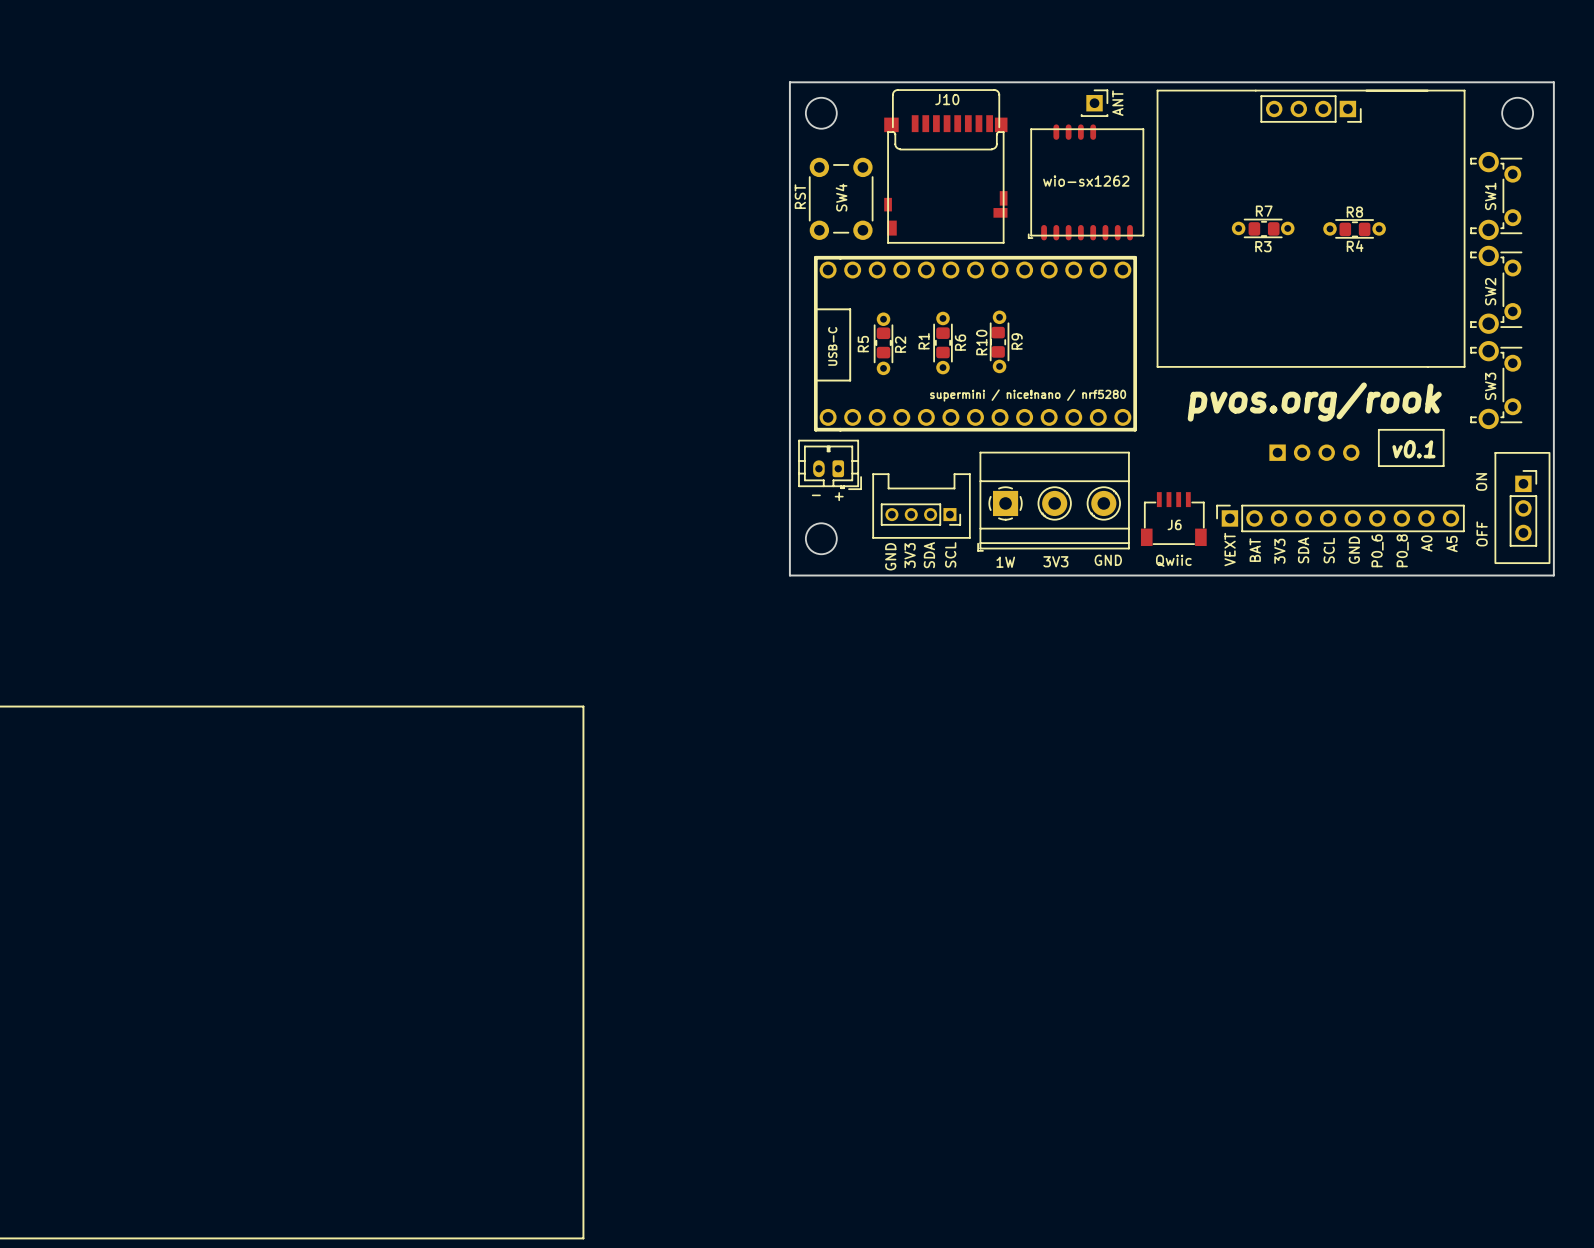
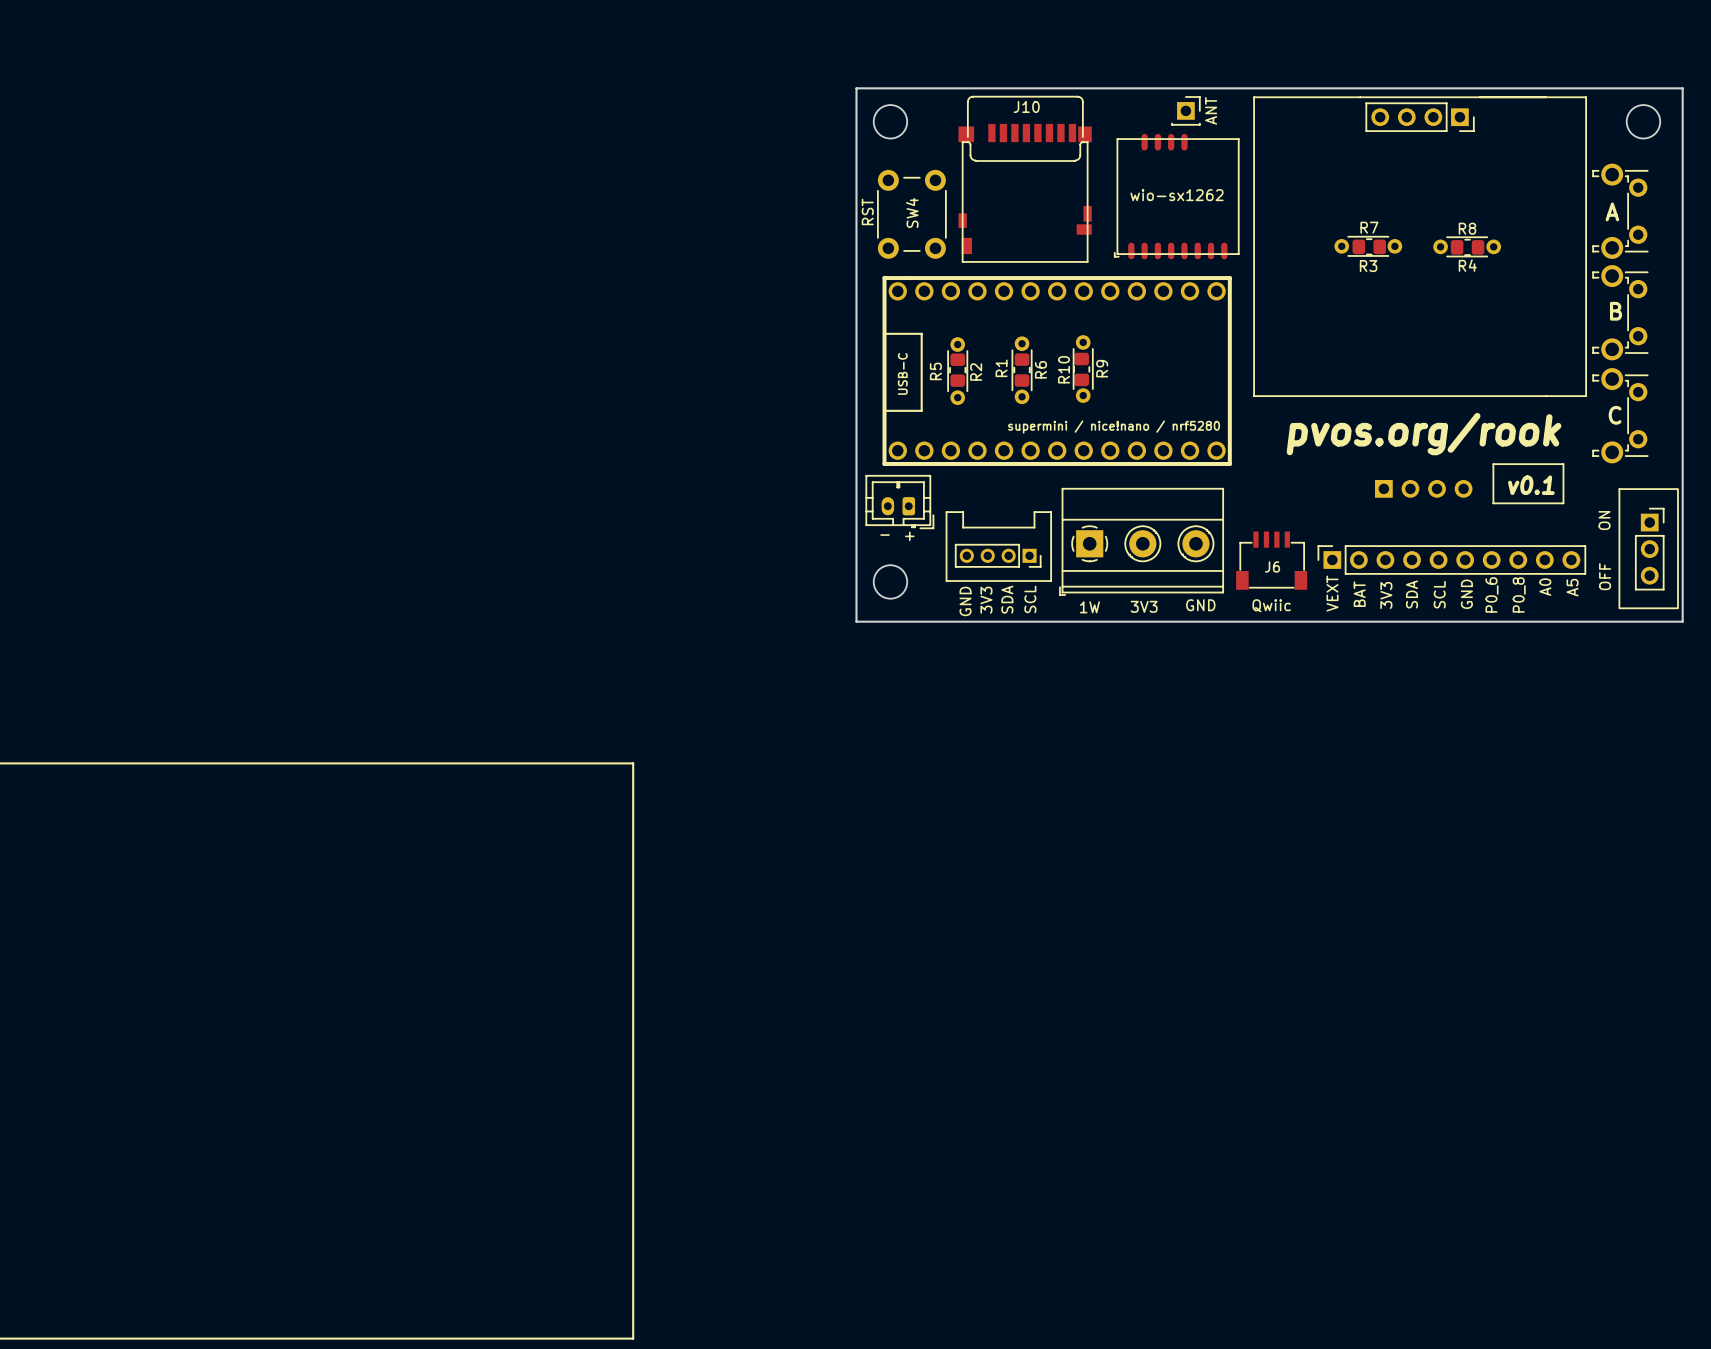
text: none -> A (1612, 211)
SW1 name: SW1 (1490, 196) -> none
text: none -> B (1615, 311)
SW2 name: SW2 (1490, 291) -> none
text: none -> C (1615, 415)
SW3 name: SW3 (1490, 386) -> none

